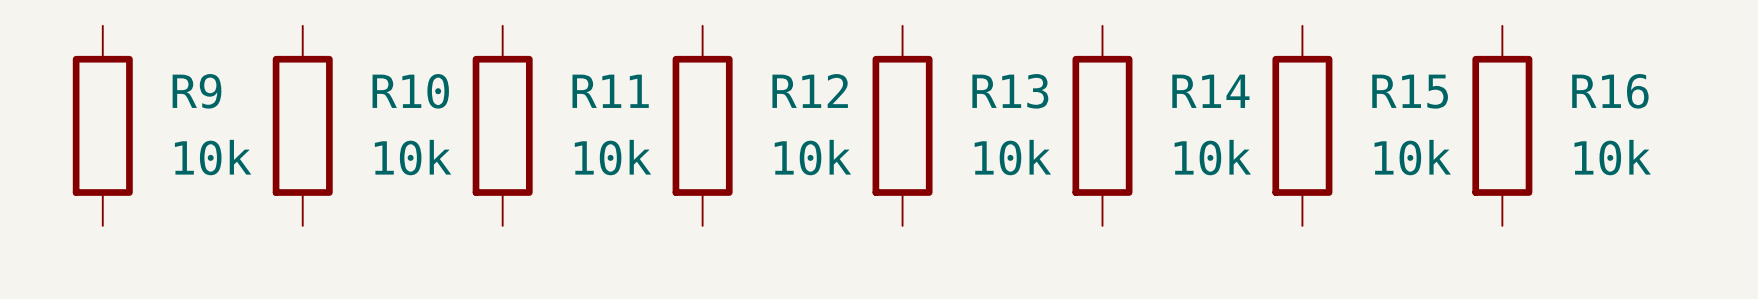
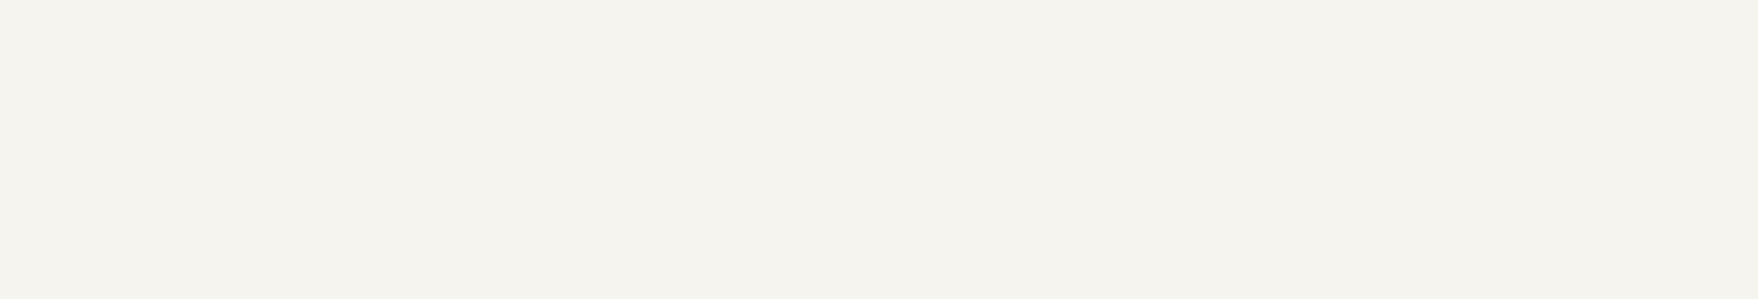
R9: 10k (102, 125) -> none
R10: 10k (302, 125) -> none
R11: 10k (502, 125) -> none
R12: 10k (702, 125) -> none
R13: 10k (902, 125) -> none
R14: 10k (1102, 125) -> none
R15: 10k (1302, 125) -> none
R16: 10k (1502, 125) -> none

